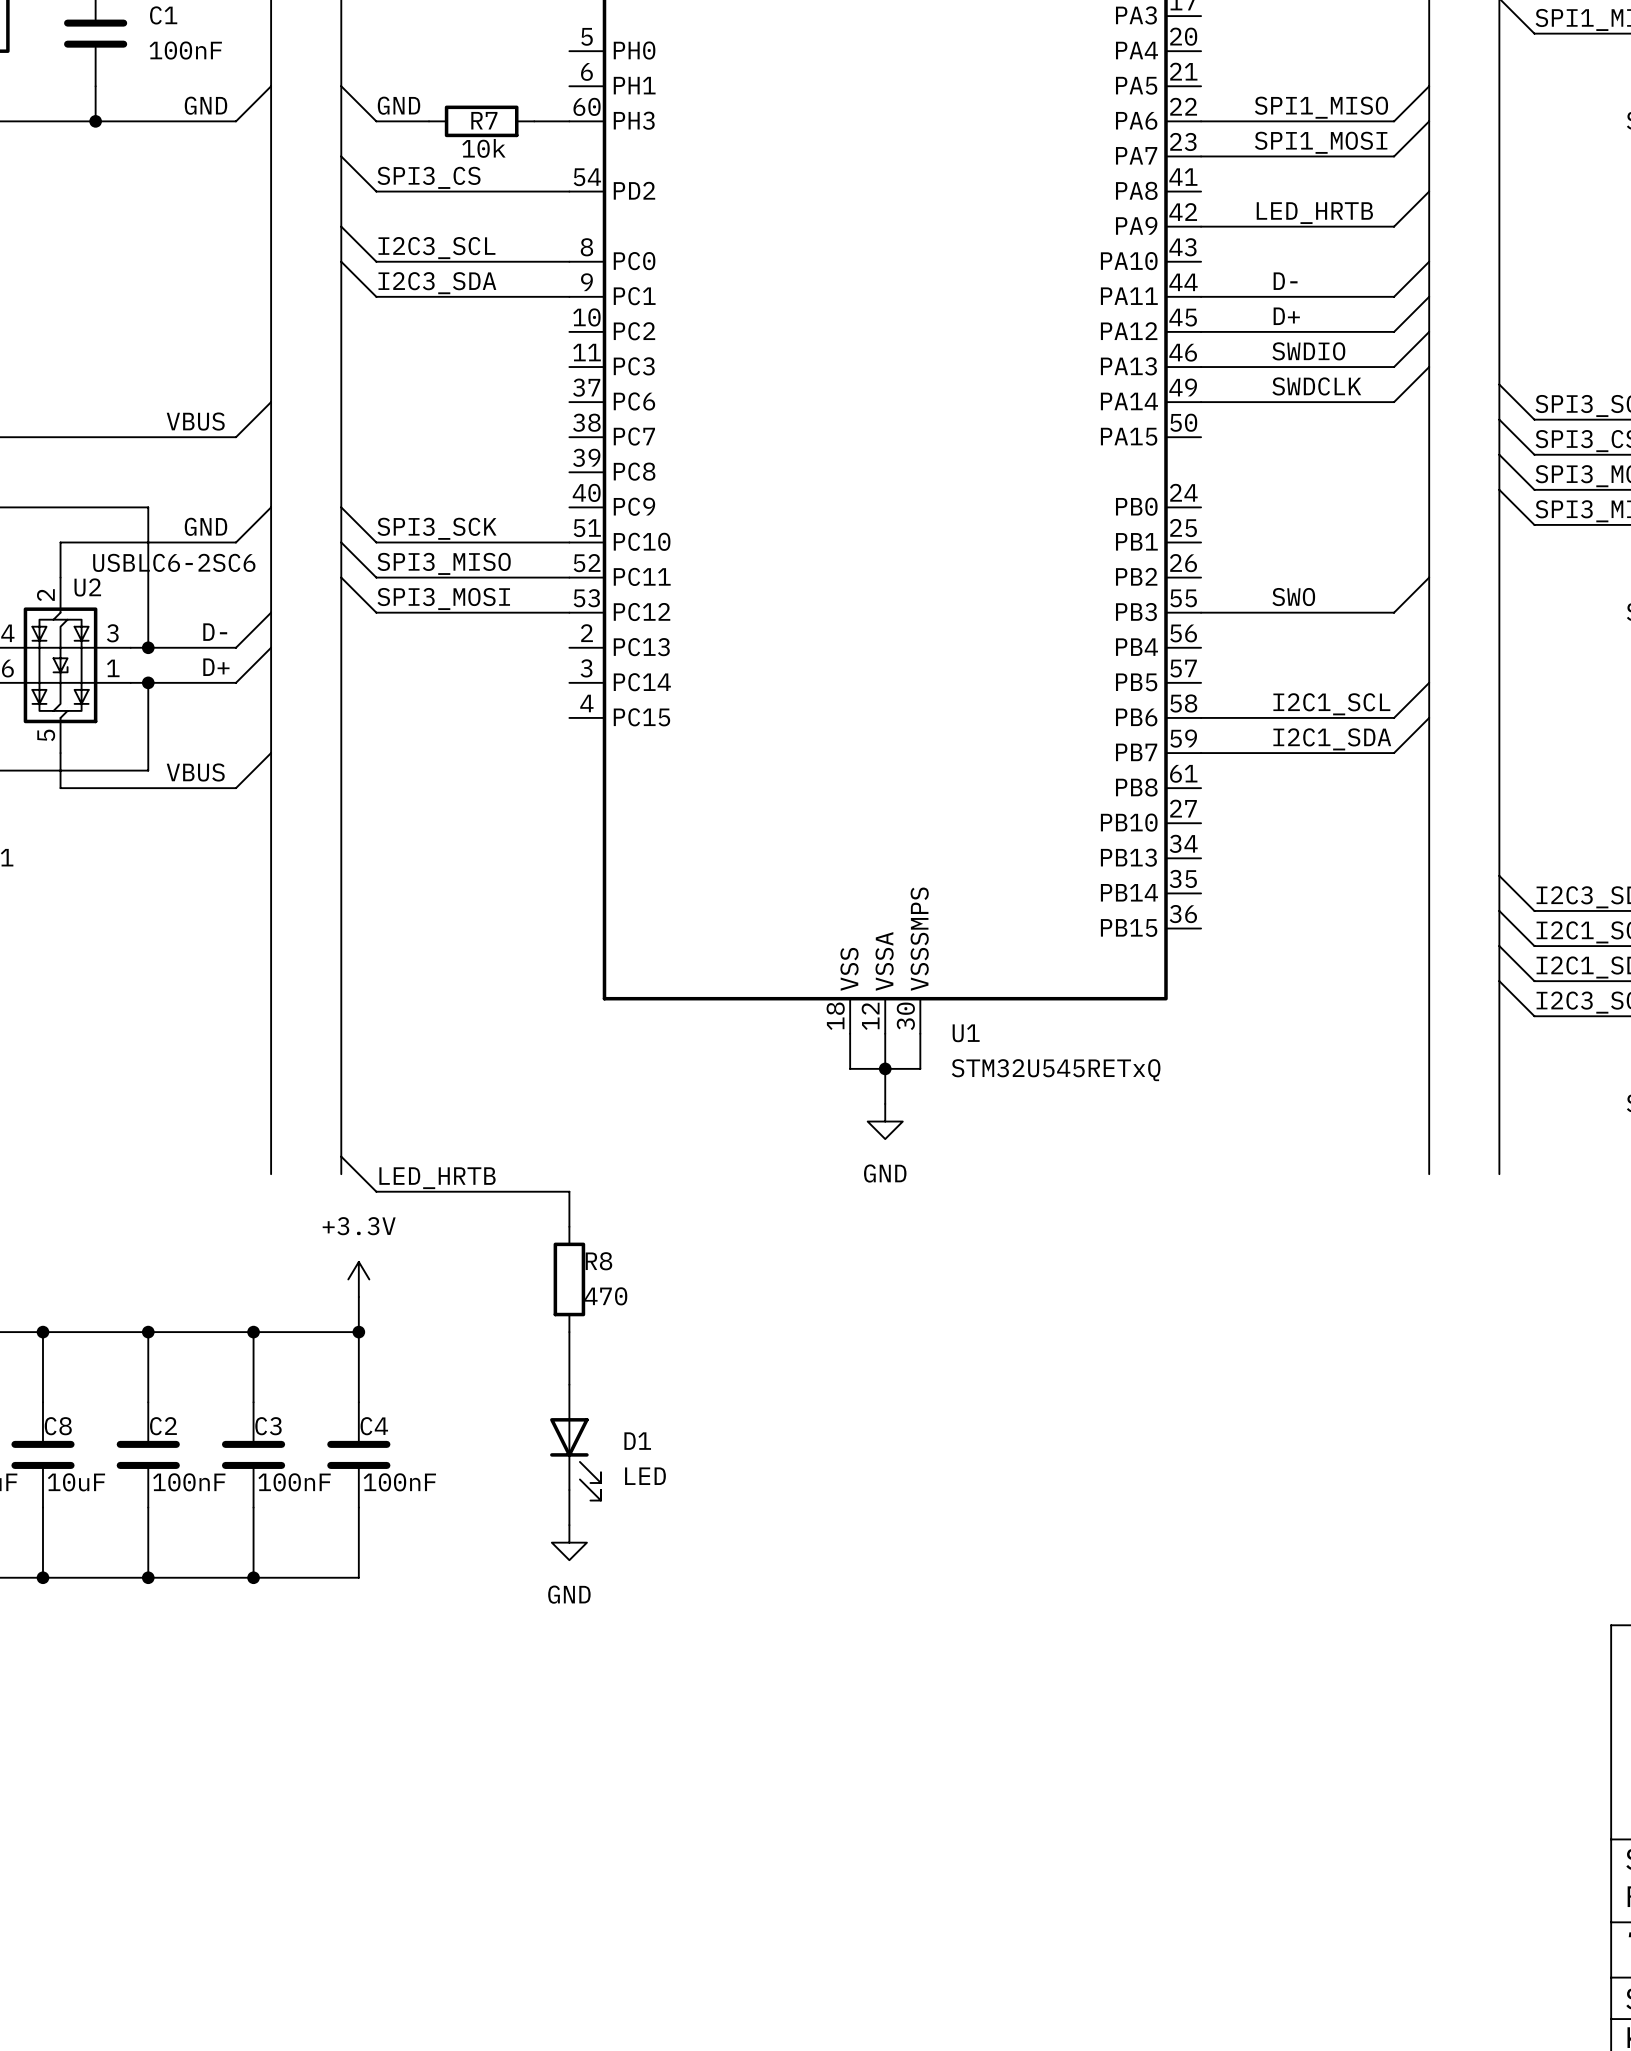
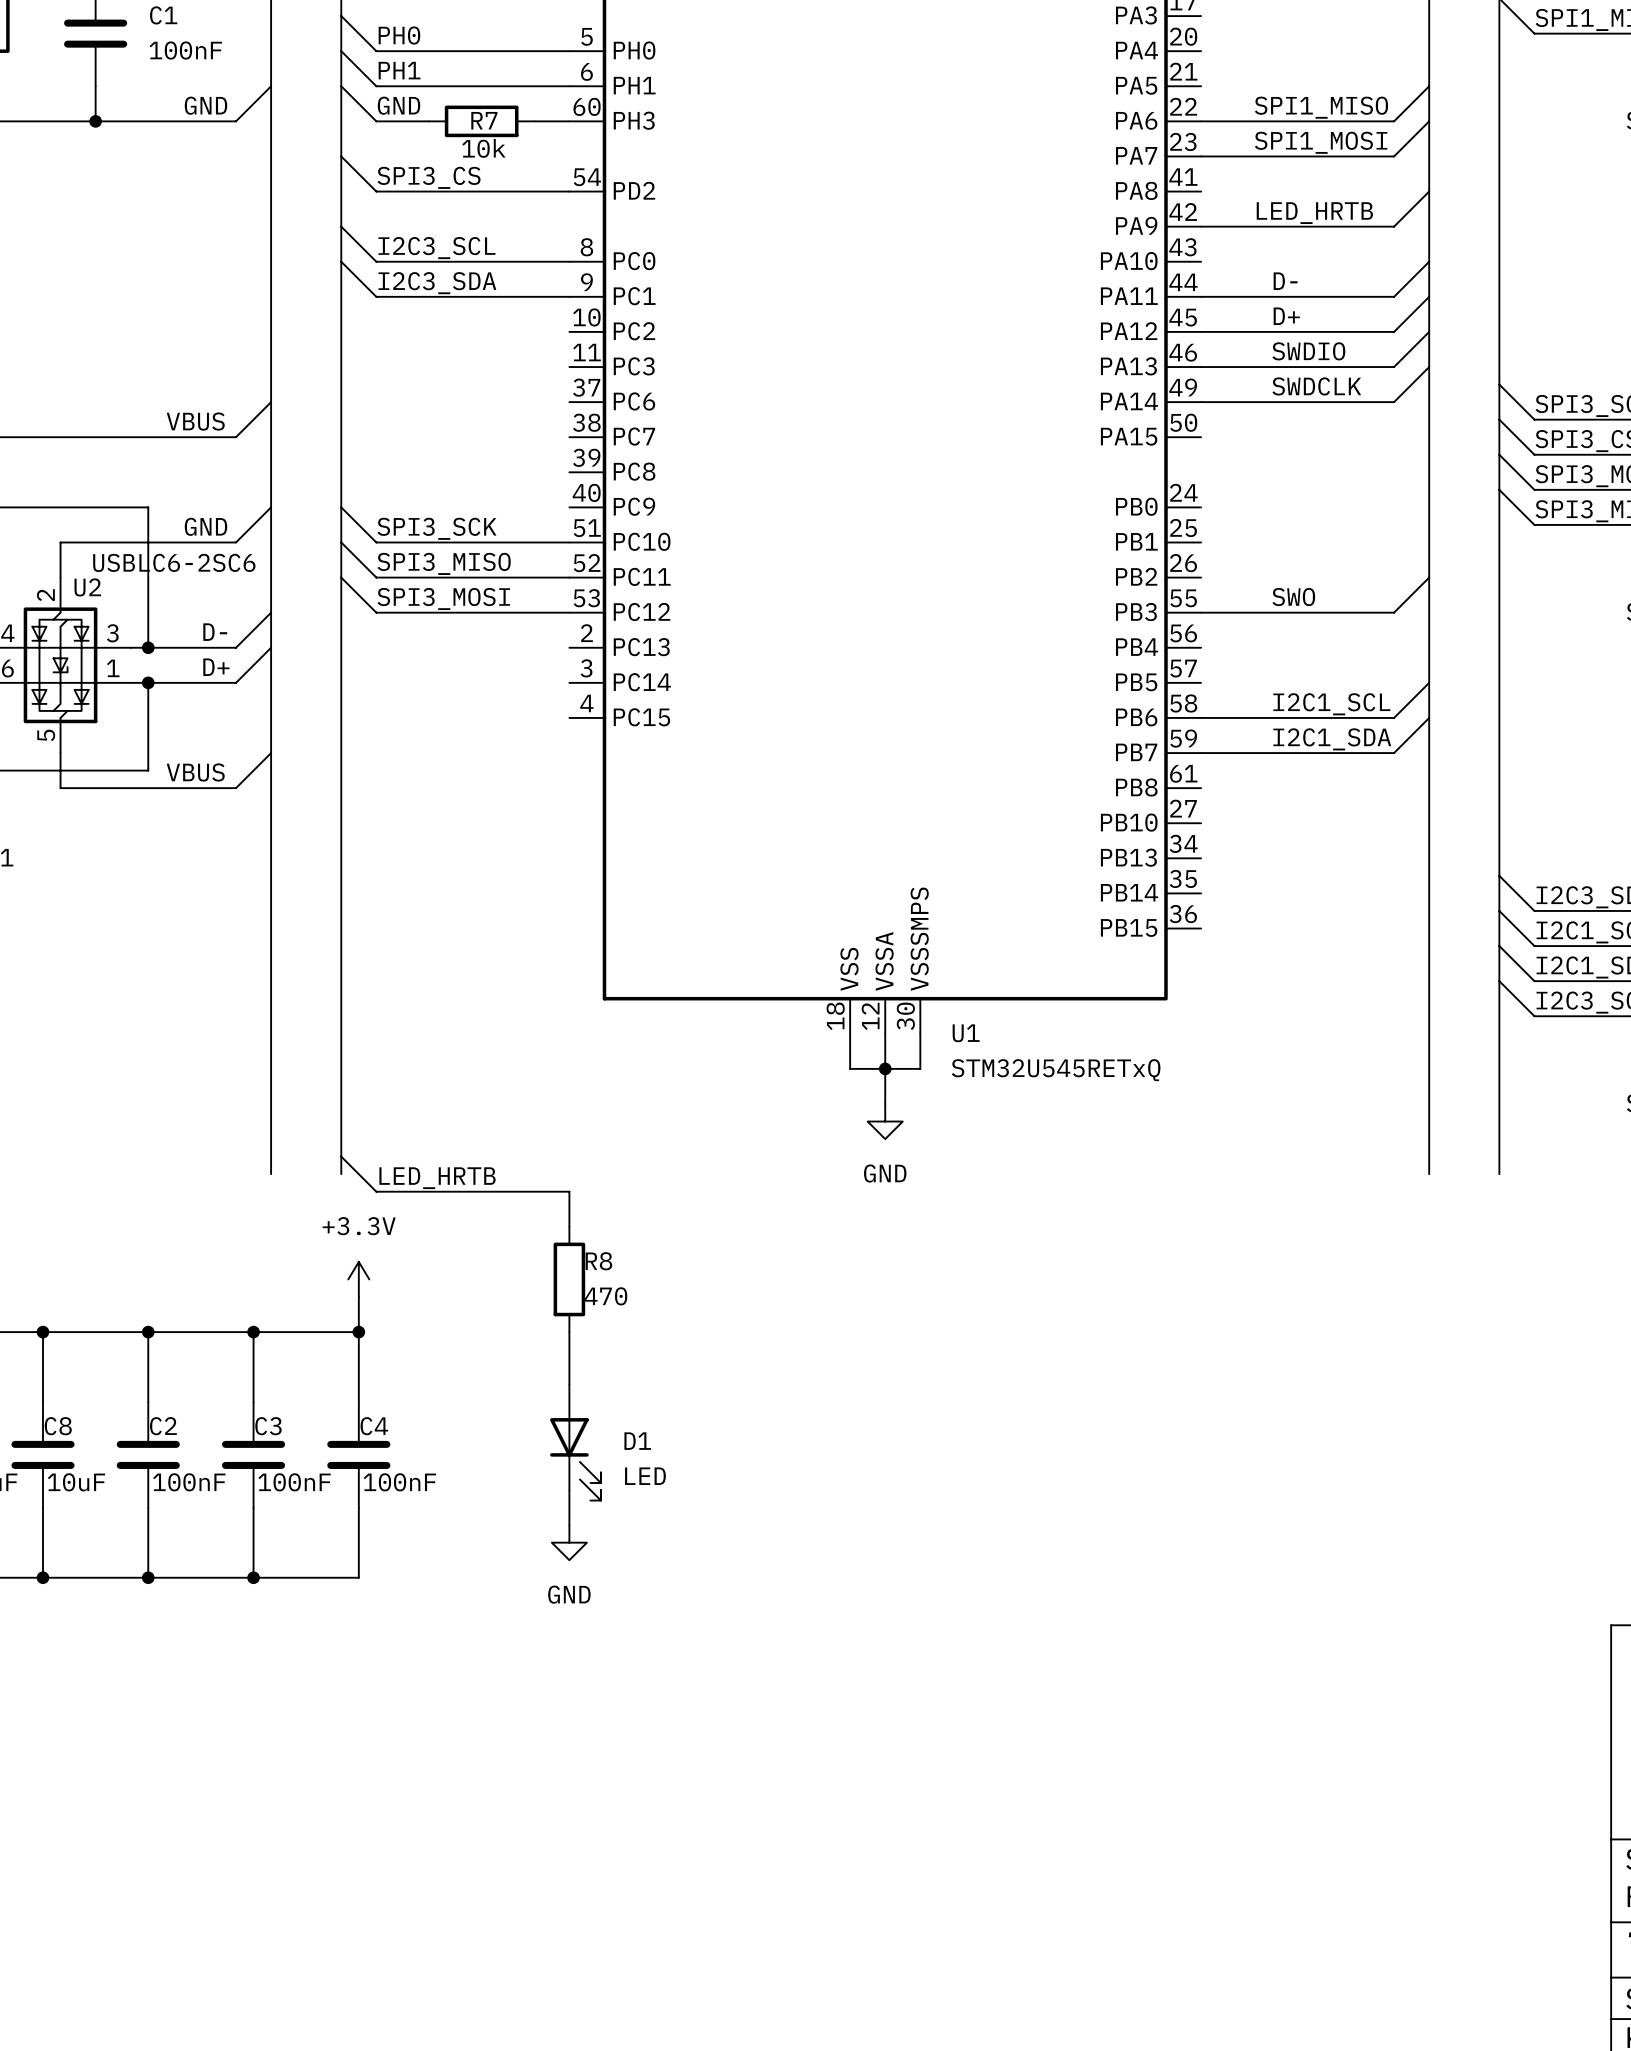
wire: none -> (341, 16) (376, 51) (569, 51)
label: none -> PH0 (399, 35)
wire: none -> (341, 51) (376, 86) (569, 86)
label: none -> PH1 (399, 70)

